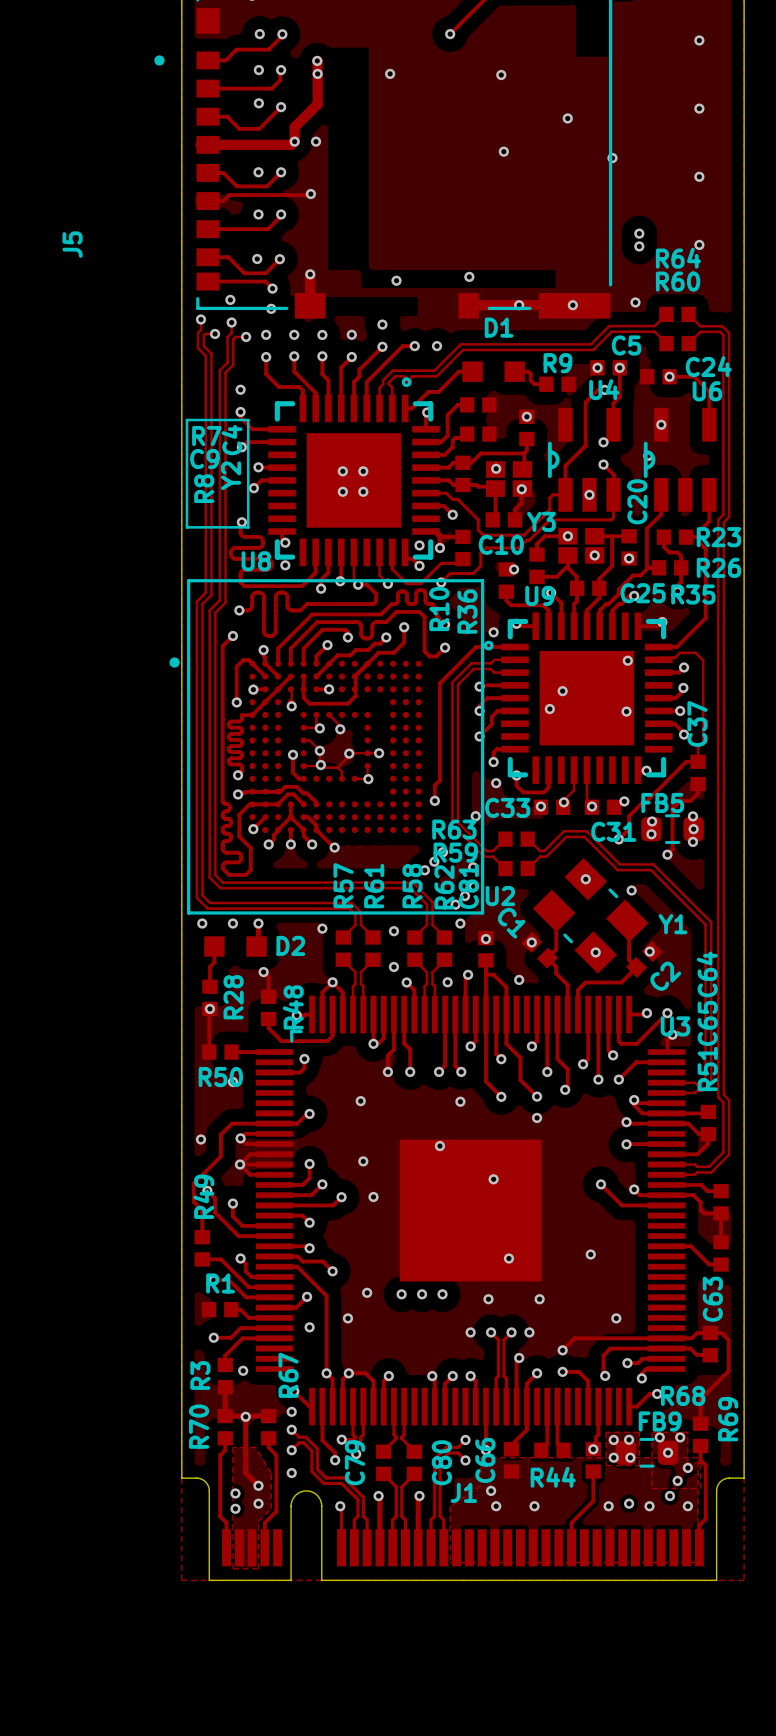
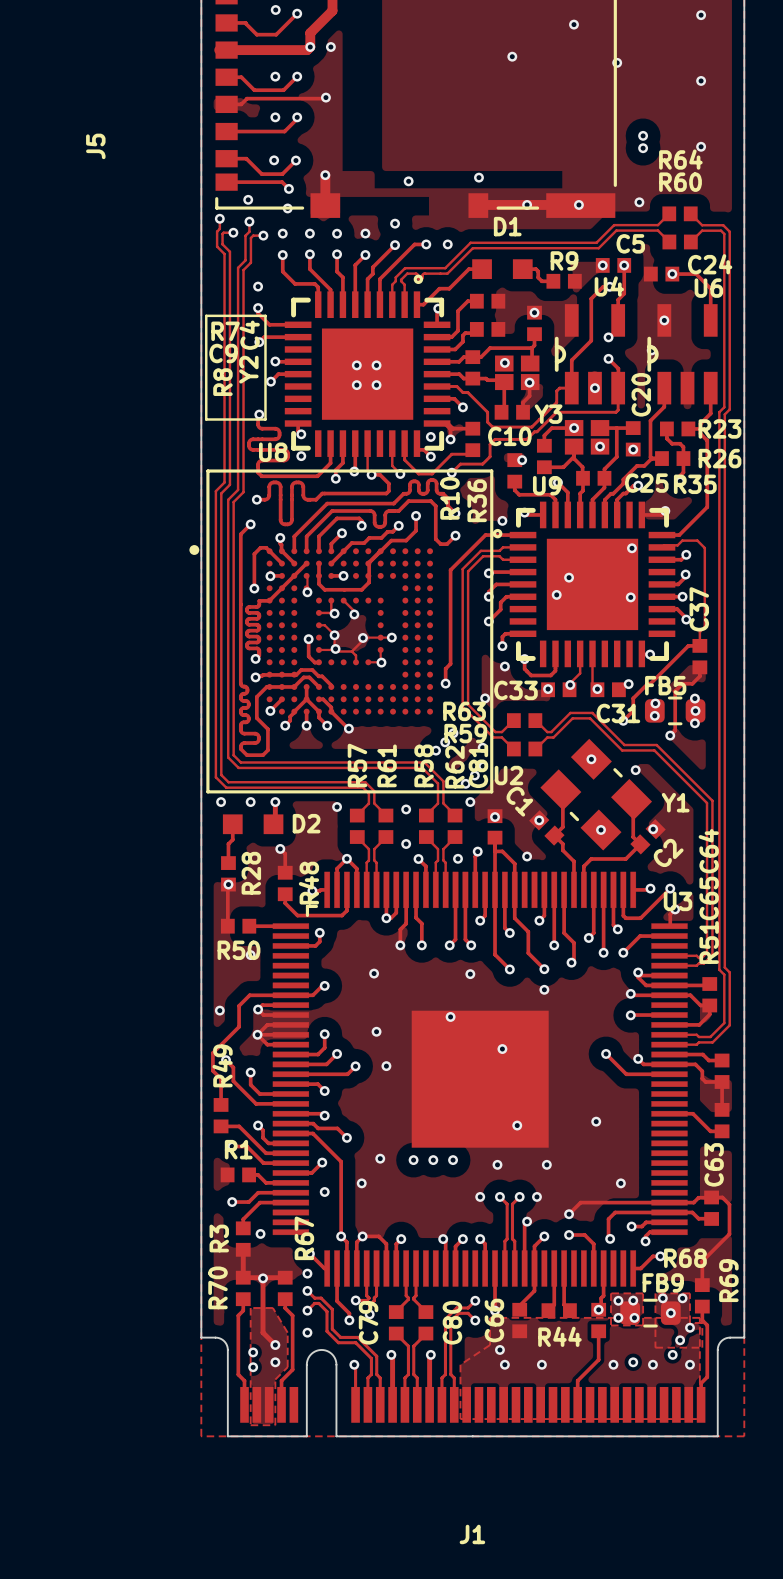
J1 name position: J1 (463, 1492) -> J1 (472, 1534)

